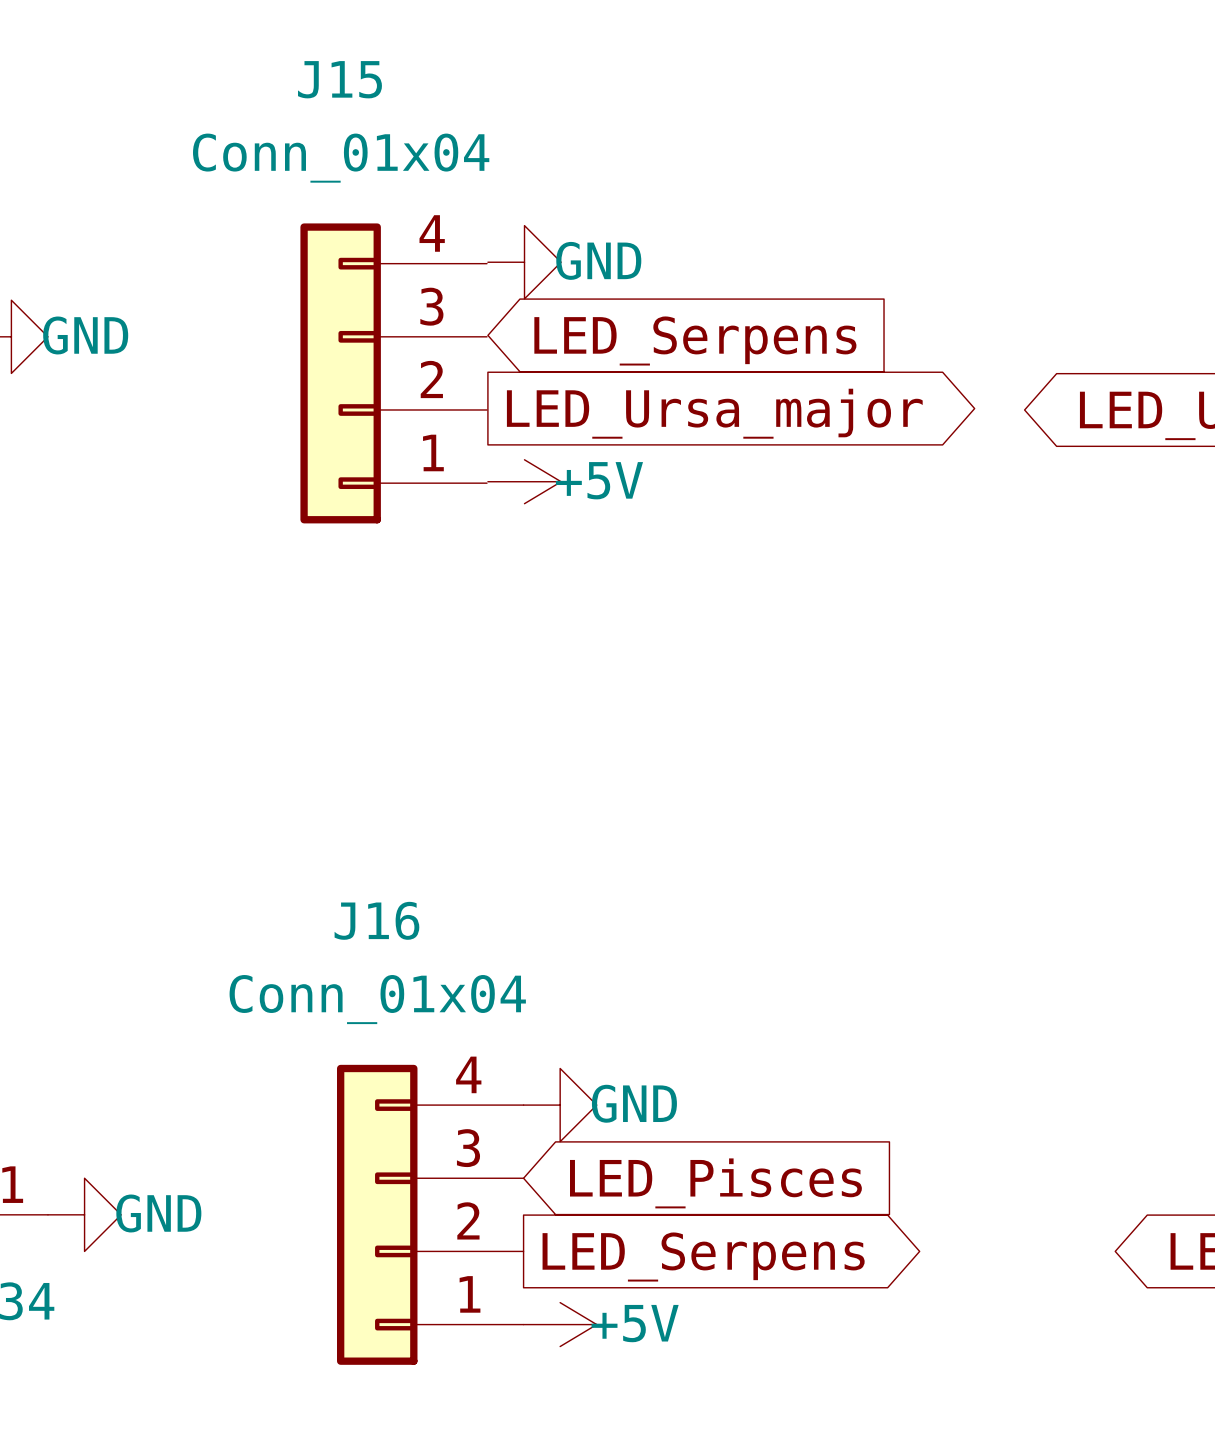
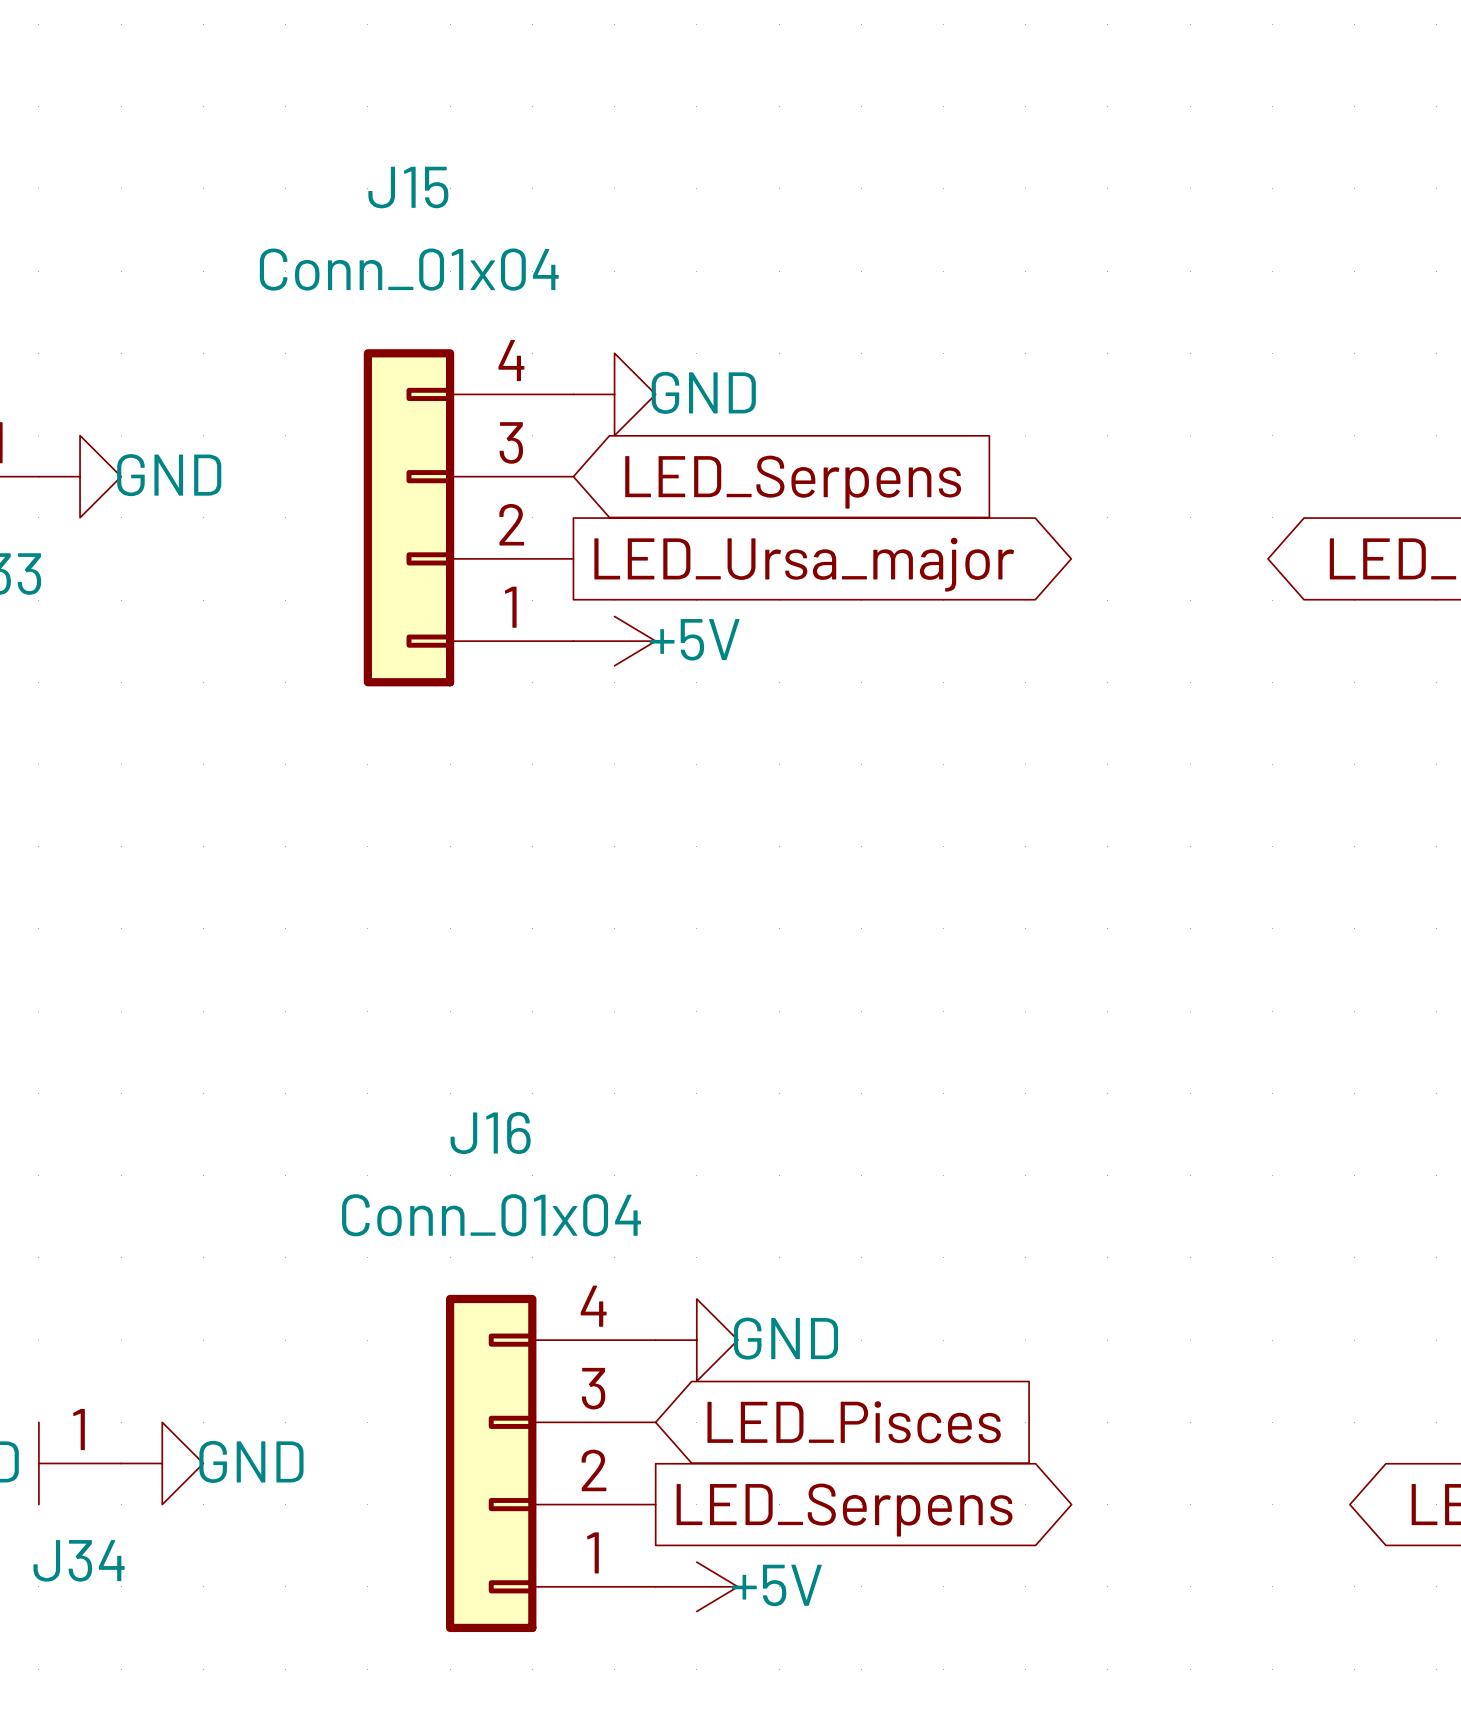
power symbol position: GND (524, 262) -> GND (614, 394)
global label position: LED_Serpens (695, 340) -> LED_Serpens (793, 482)
J15 position: (393, 373) -> (468, 517)
global label position: LED_Ursa_major (714, 413) -> LED_Ursa_major (804, 564)
power symbol position: +5V (524, 481) -> +5V (614, 641)

